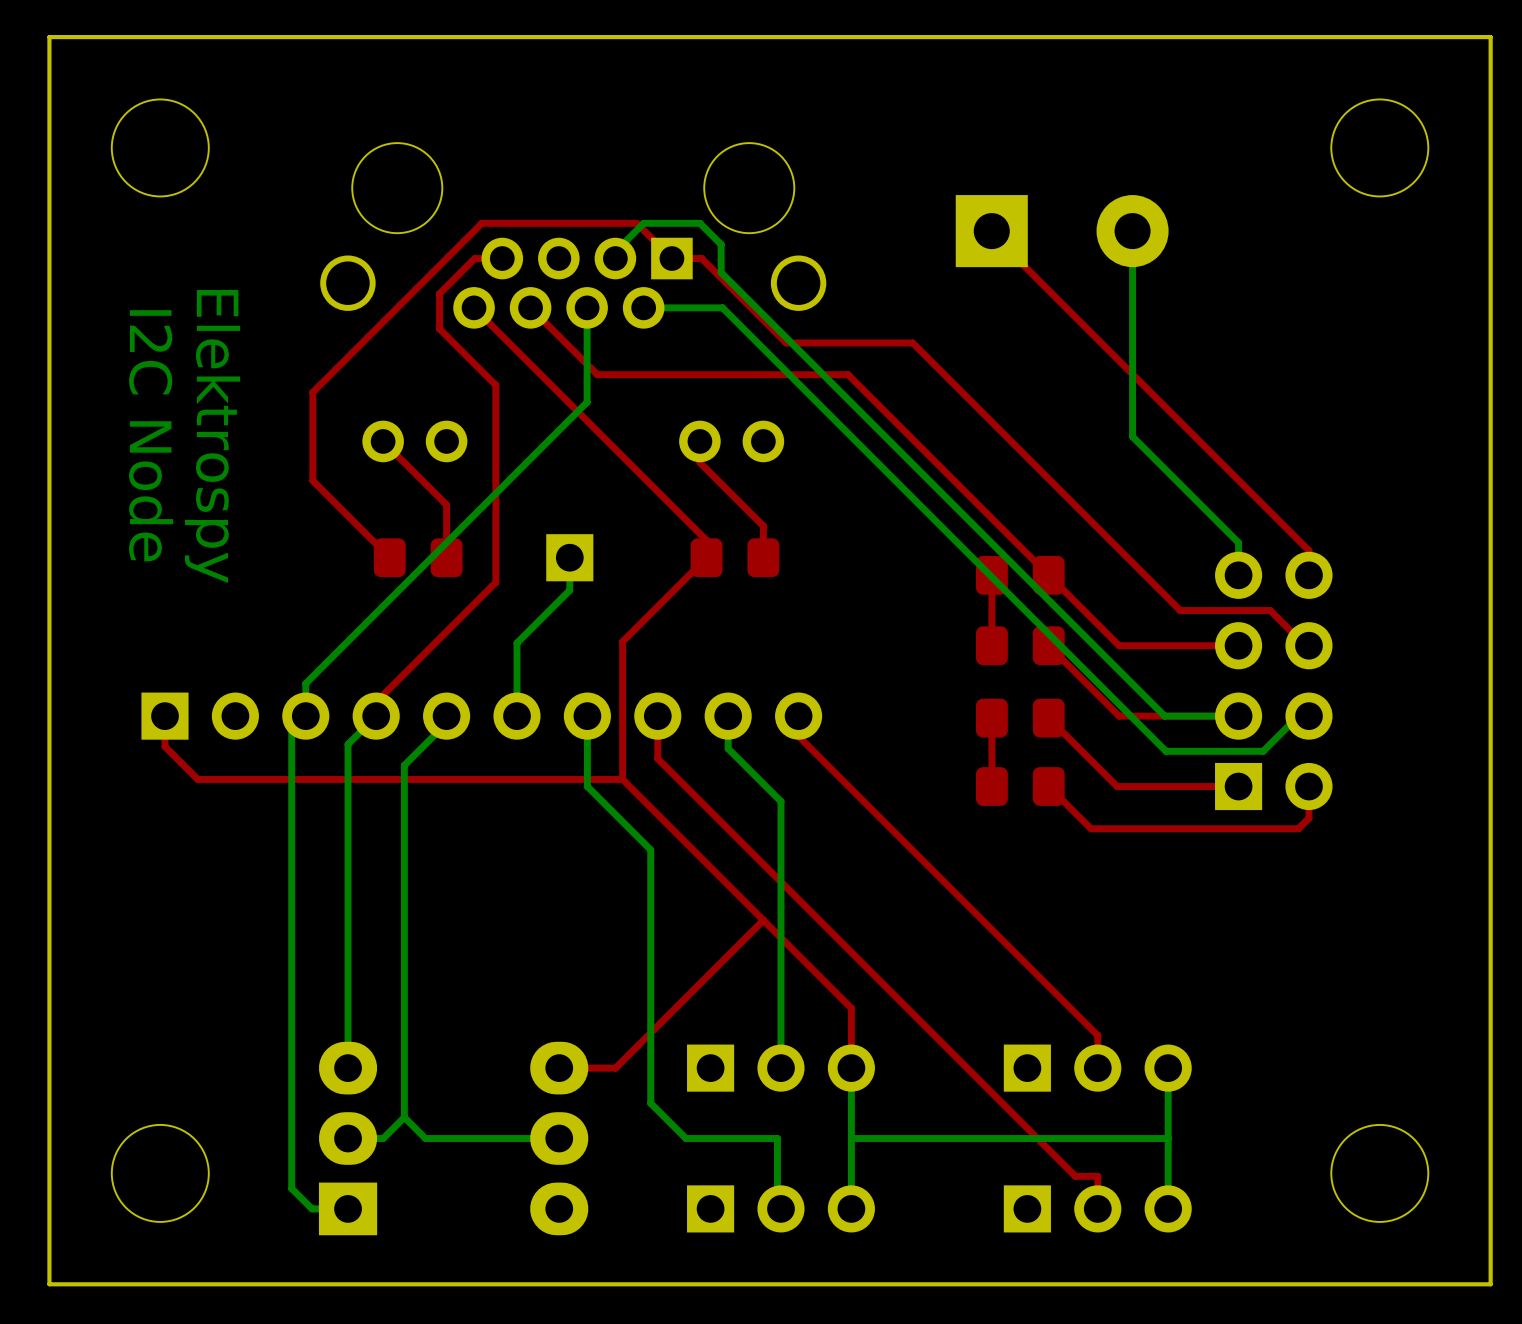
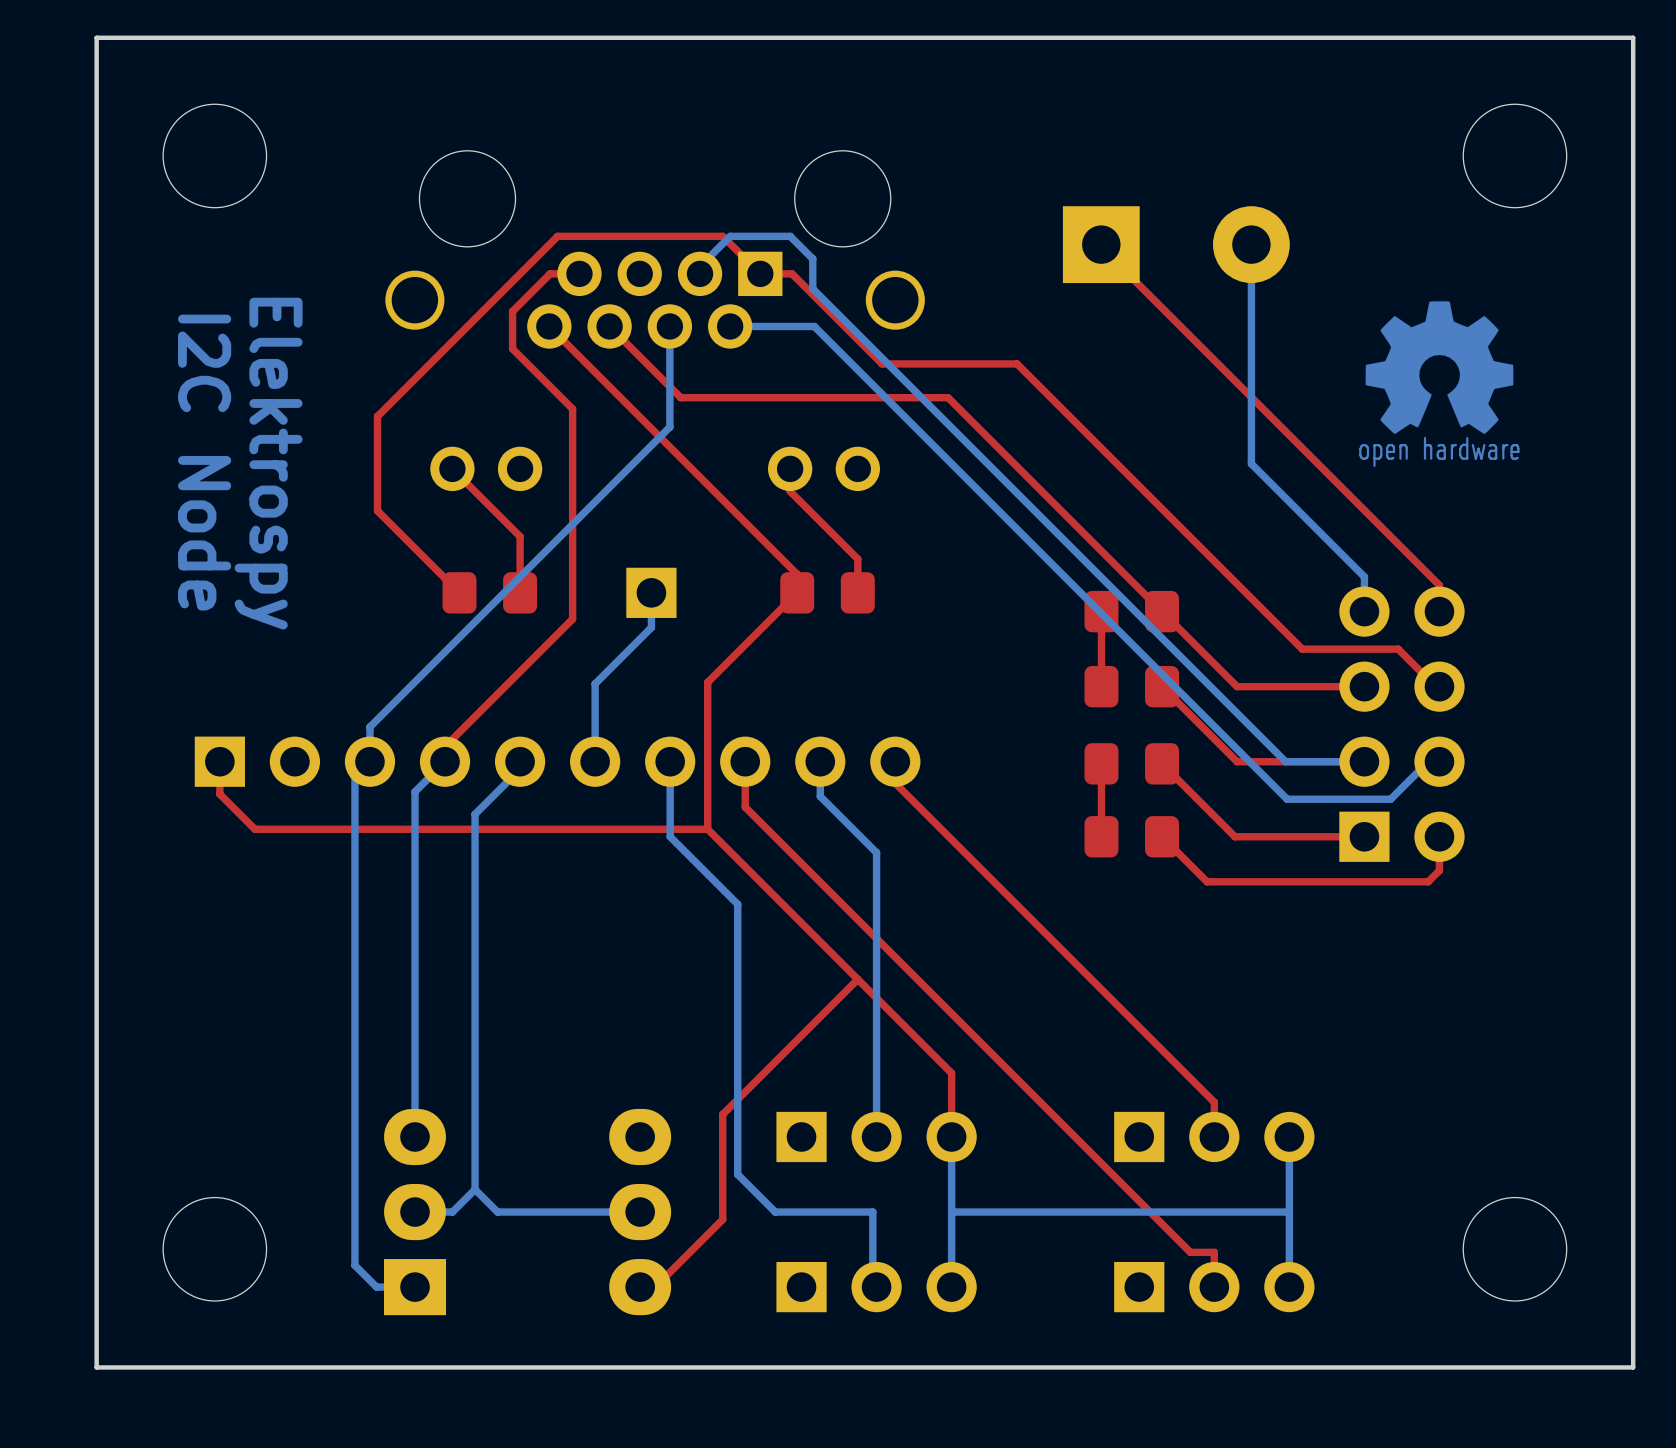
drawing: none -> [1359, 301, 1520, 467]
top track: (636, 1046) (615, 1068) (559, 1068) -> (722, 1114) (722, 1219) (655, 1287) (640, 1287)

